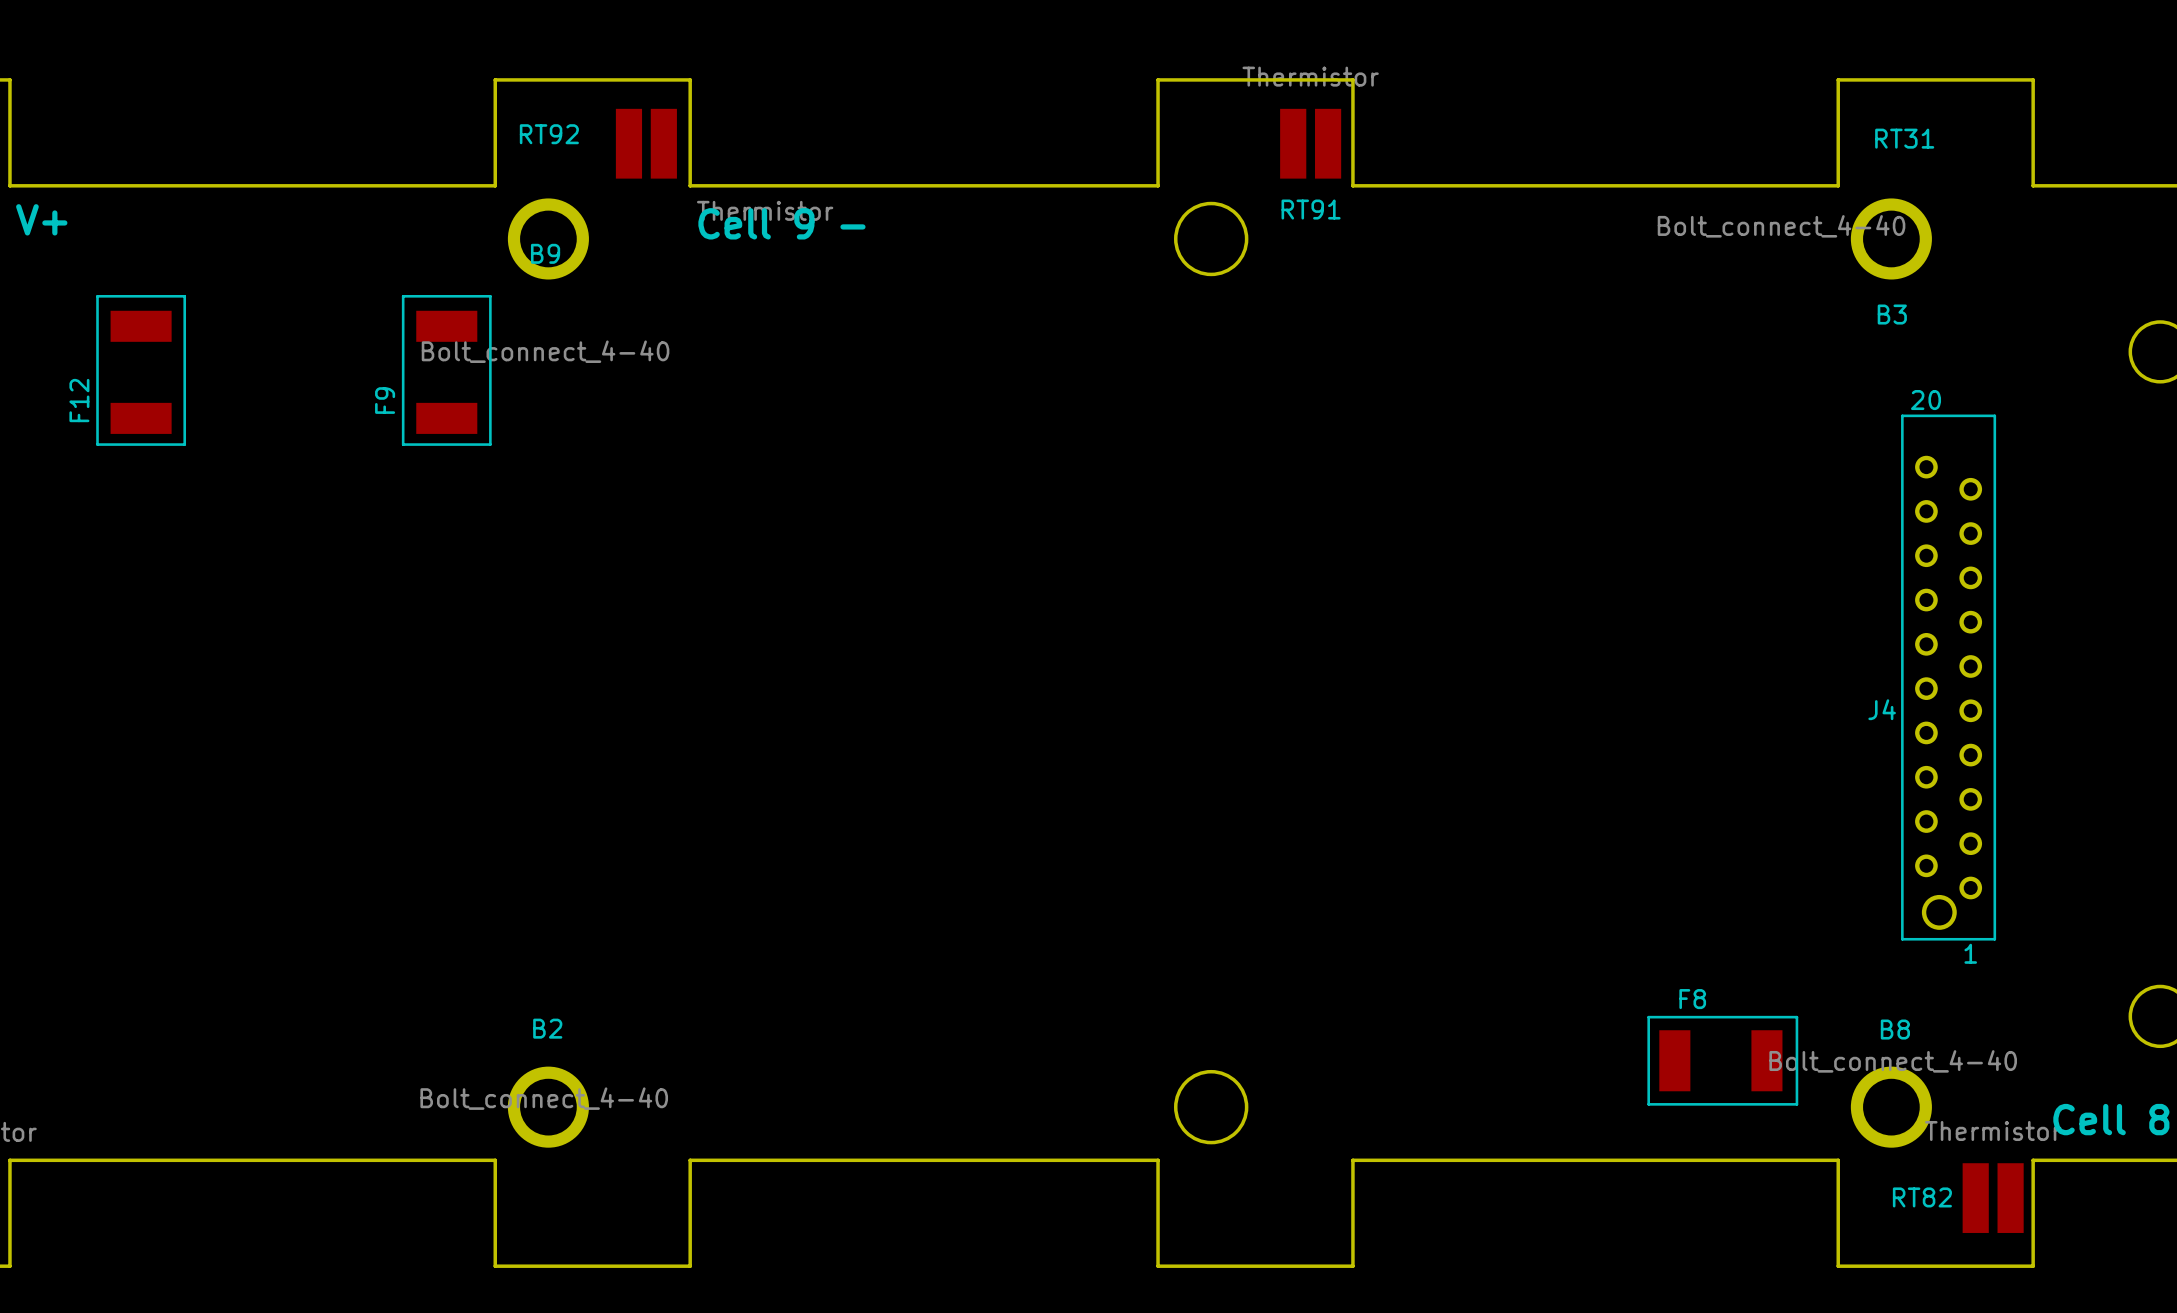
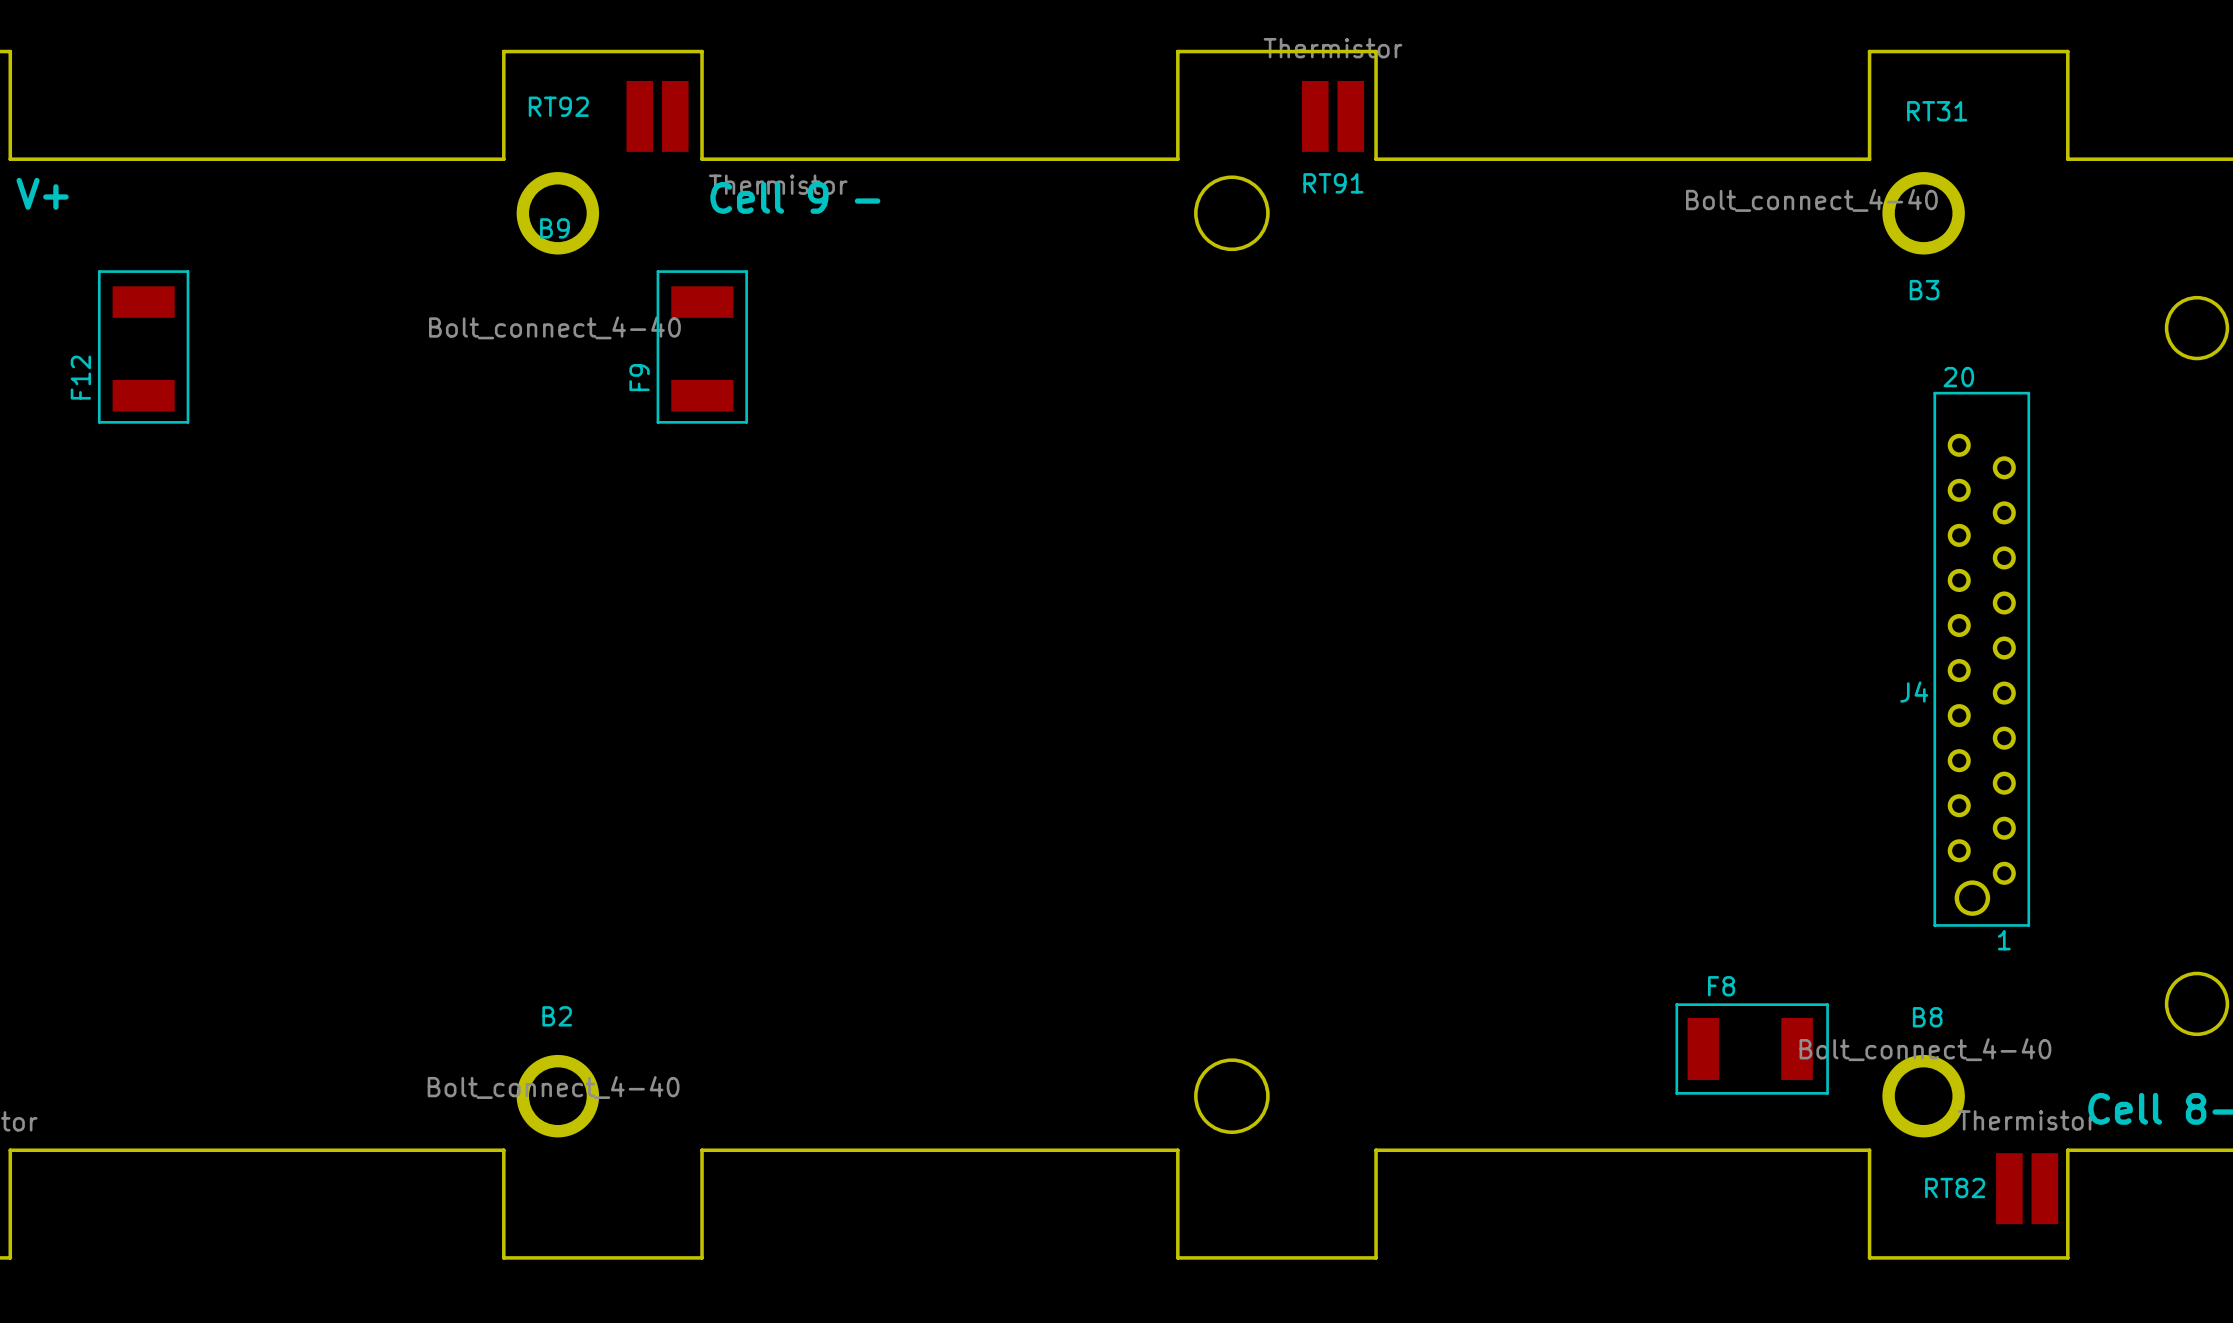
F9 position: (446, 370) -> (702, 346)

